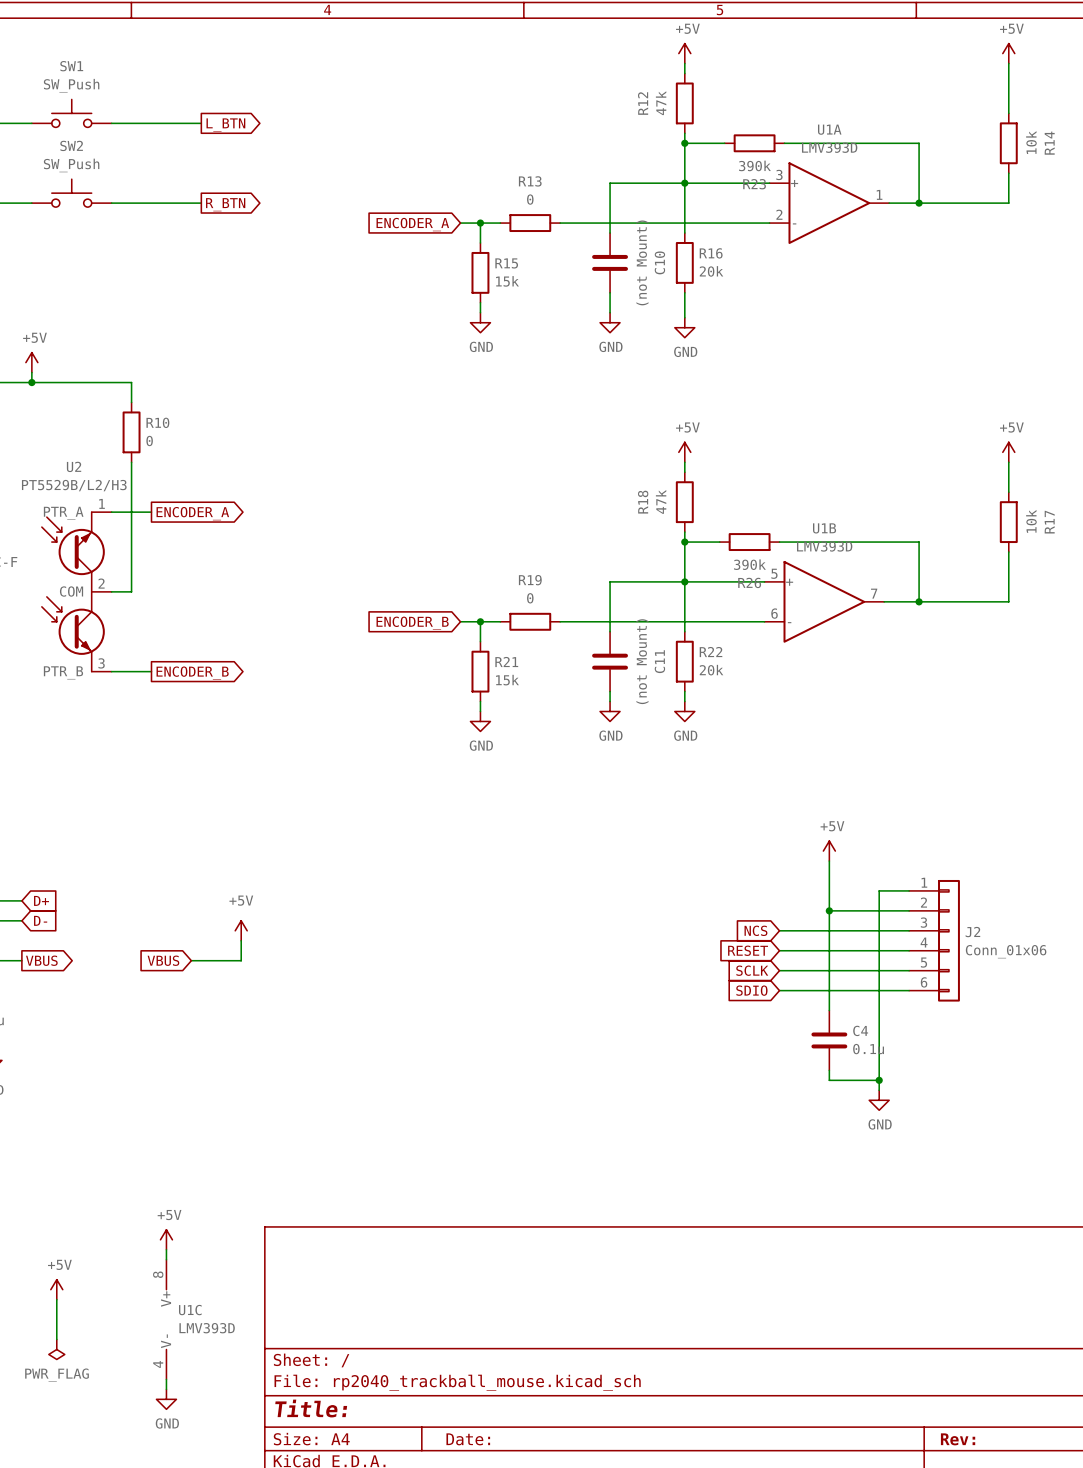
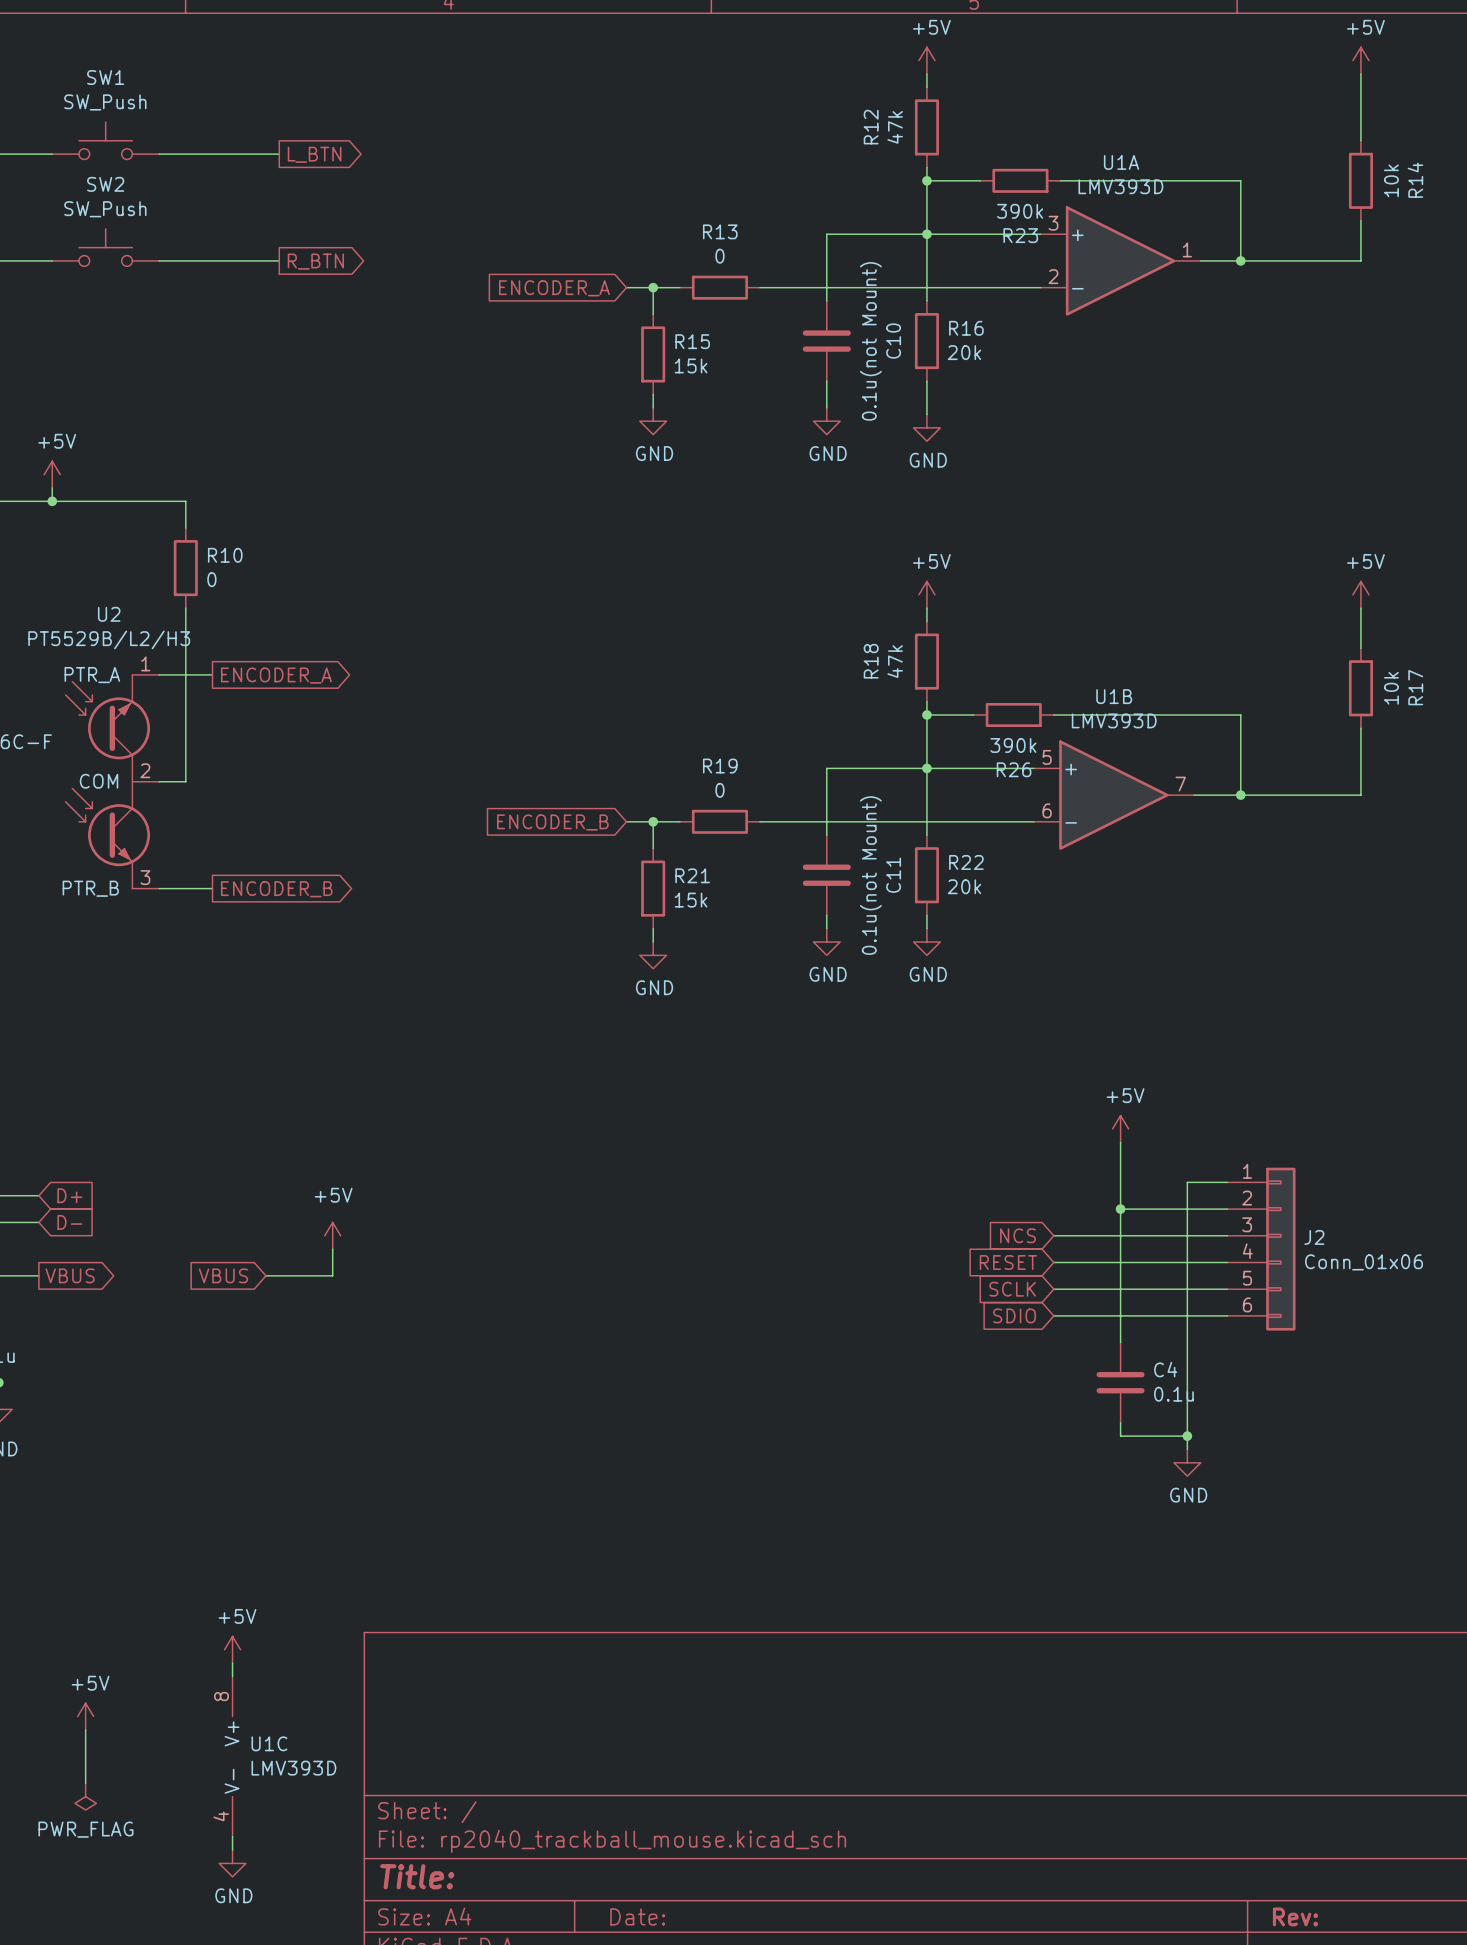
C10 value: (not Mount) (642, 262) -> 0.1u(not Mount) (870, 341)
C11 value: (not Mount) (642, 661) -> 0.1u(not Mount) (870, 875)

